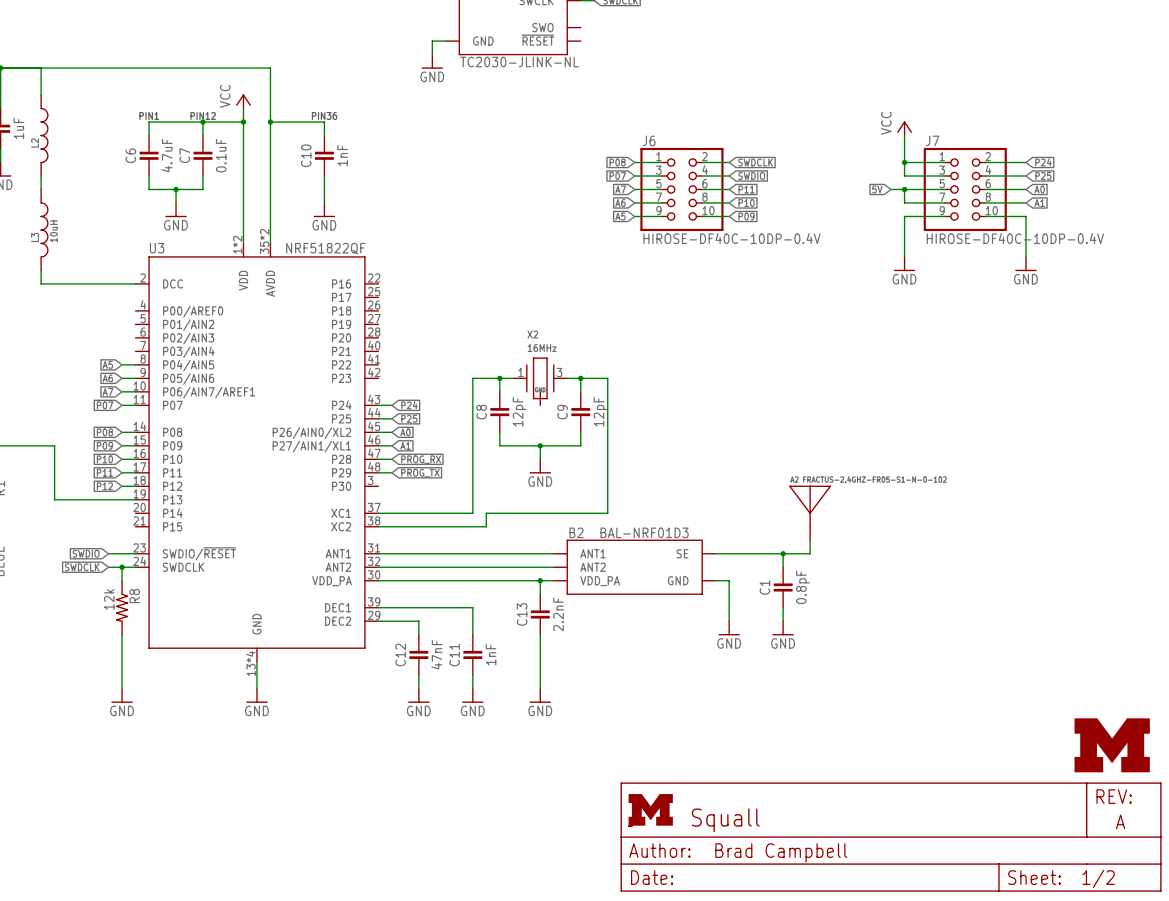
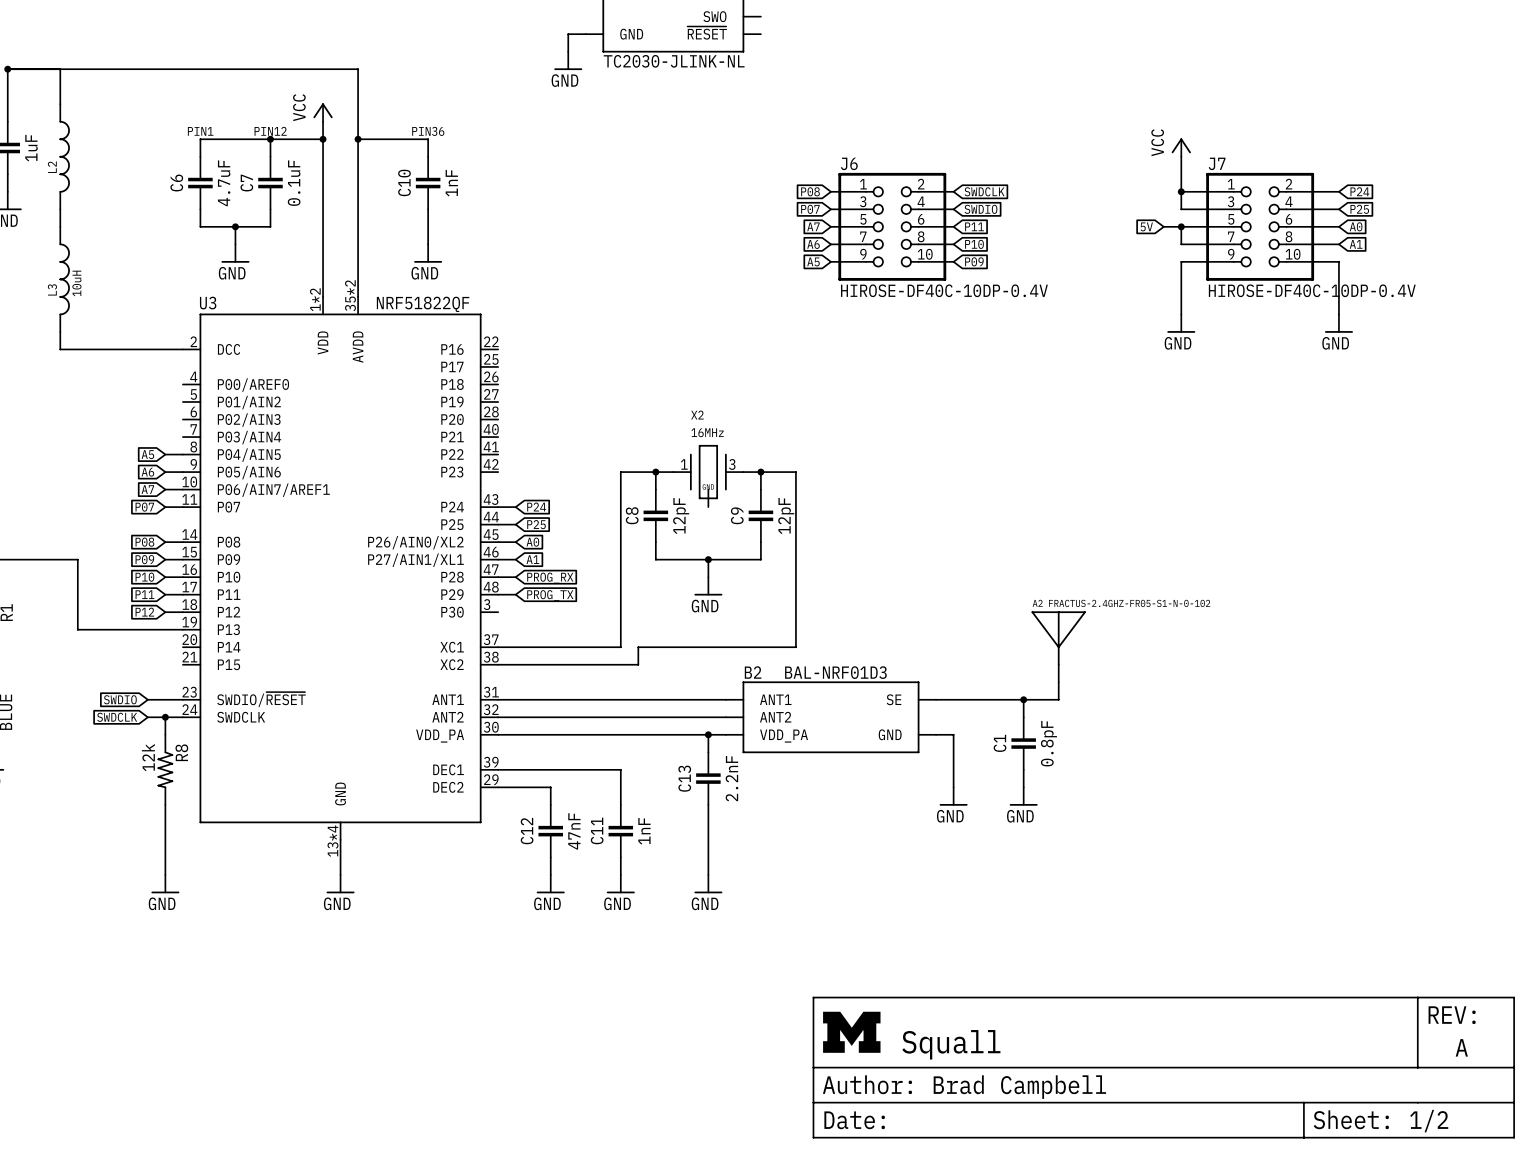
part: (1112, 745) -> none

